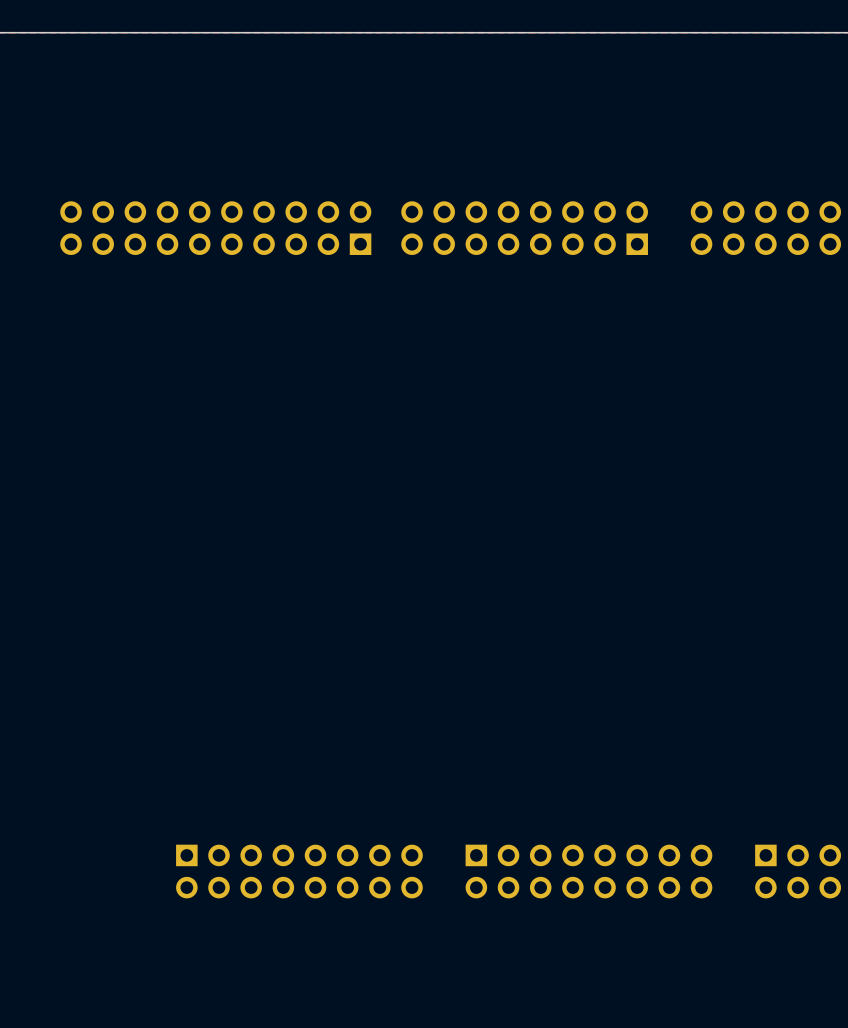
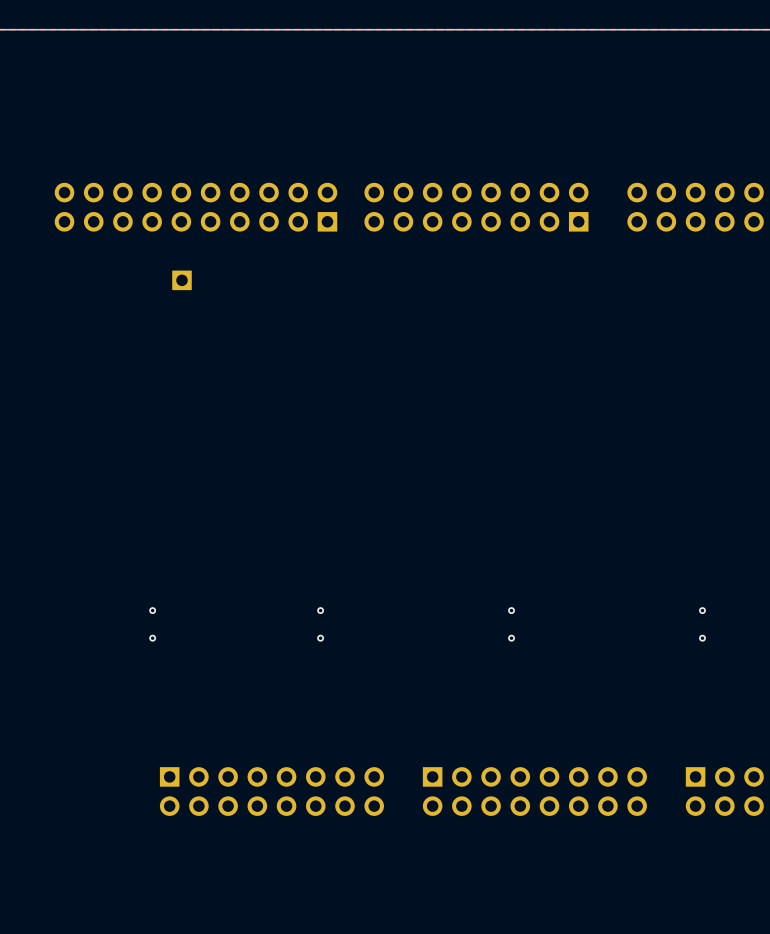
part: none -> (182, 280)
via: none -> (152, 610)
via: none -> (320, 610)
via: none -> (511, 610)
via: none -> (702, 610)
via: none -> (152, 638)
via: none -> (320, 638)
via: none -> (511, 638)
via: none -> (702, 638)

